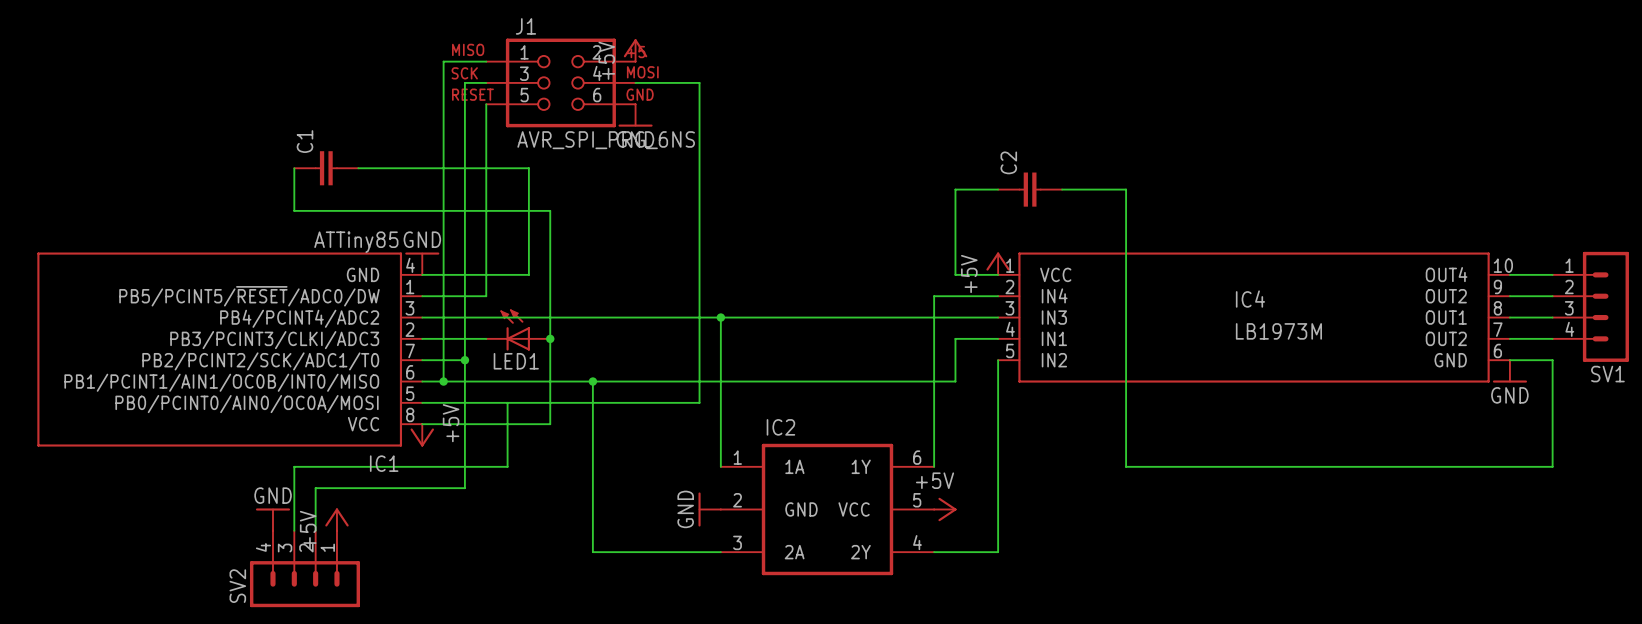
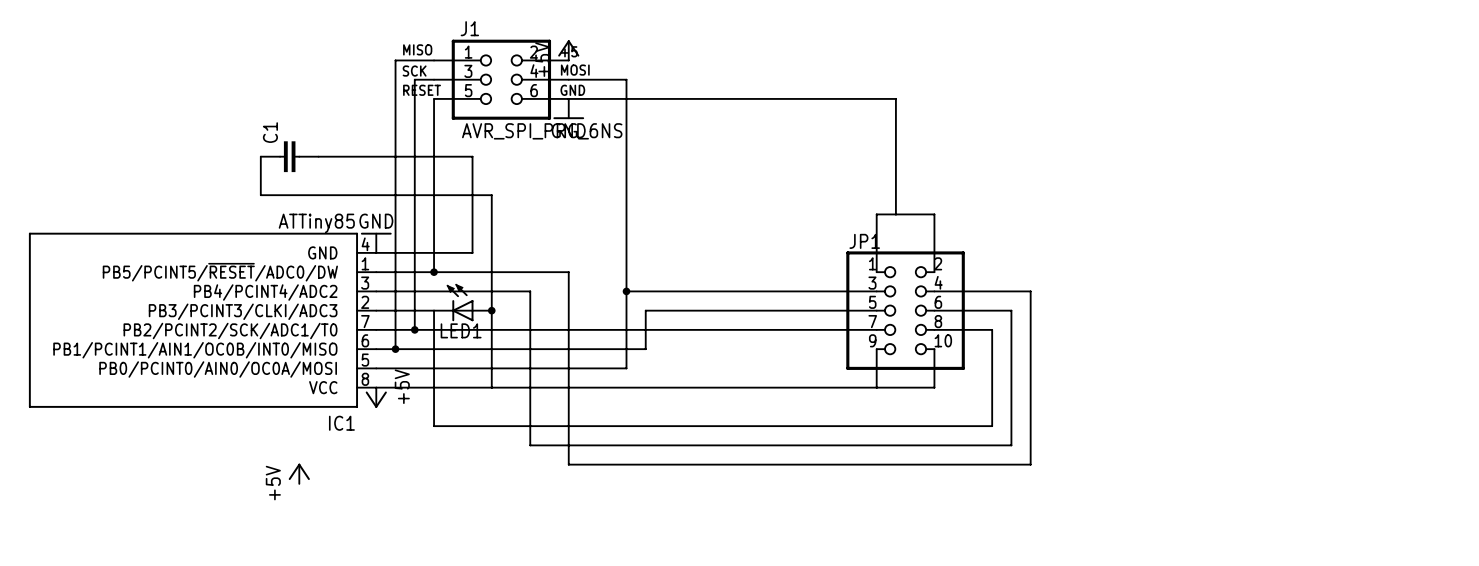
wire: none -> (568, 98) (895, 98) (895, 214)
wire: (998, 189) (955, 189) (955, 274) (998, 274) -> none
C2: (1030, 189) -> none
wire: (1062, 189) (1126, 189) (1126, 338) -> (934, 310) (1011, 310)
power symbol: +5V (998, 263) -> none
wire: (1509, 274) (1552, 274) -> none
wire: none -> (434, 272) (568, 272) (568, 464) (1030, 464) (1030, 291) (934, 291)
junction: none -> (434, 272)
wire: none -> (876, 272) (876, 214) (934, 214) (934, 272)
wire: (998, 296) (934, 296) (934, 466) -> none
wire: (1509, 296) (1552, 296) -> none
SV1: (1590, 306) -> none
wire: (592, 317) (699, 317) -> (530, 291) (530, 349)
wire: (720, 317) (720, 338) -> none
junction position: (720, 317) -> (626, 291)
IC4: LB1973M (1254, 317) -> none
wire: (1509, 317) (1552, 317) -> none
wire: (955, 338) (955, 381) (720, 381) (720, 466) -> (857, 310) (645, 310)
JP1: none -> (905, 310)
wire: (1509, 338) (1552, 338) -> none
wire: (464, 360) (464, 488) (315, 488) (315, 530) -> (414, 329) (876, 329)
wire: (998, 360) (998, 552) (934, 552) -> none
wire: (1509, 360) (1552, 360) (1552, 466) (1126, 466) -> none
power symbol: GND (1509, 371) -> none
junction: (592, 381) -> none
wire: none -> (876, 349) (876, 387)
wire: none -> (934, 349) (934, 387) (491, 387)
wire: (507, 402) (507, 466) -> (934, 329) (992, 329) (992, 426) (453, 426)
wire: (486, 466) (294, 466) (294, 530) -> (434, 426) (434, 310)
wire: (592, 488) (592, 552) (720, 552) -> (530, 445) (1011, 445) (1011, 426)
power symbol: GND (709, 509) -> none
IC2: (827, 509) -> none
power symbol: +5V (945, 509) -> none
power symbol: GND (272, 519) -> none
SV2: (304, 568) -> none

